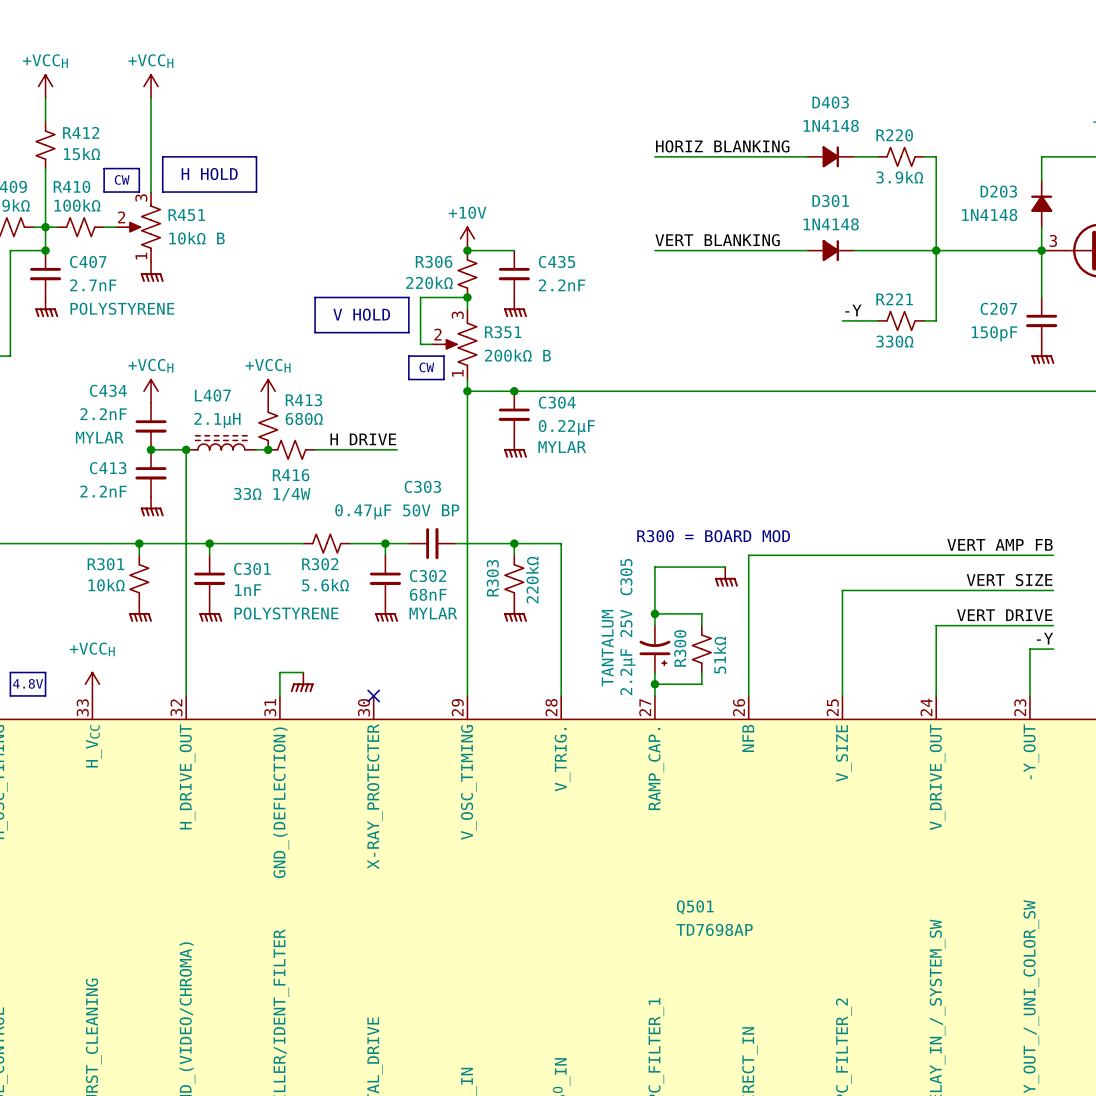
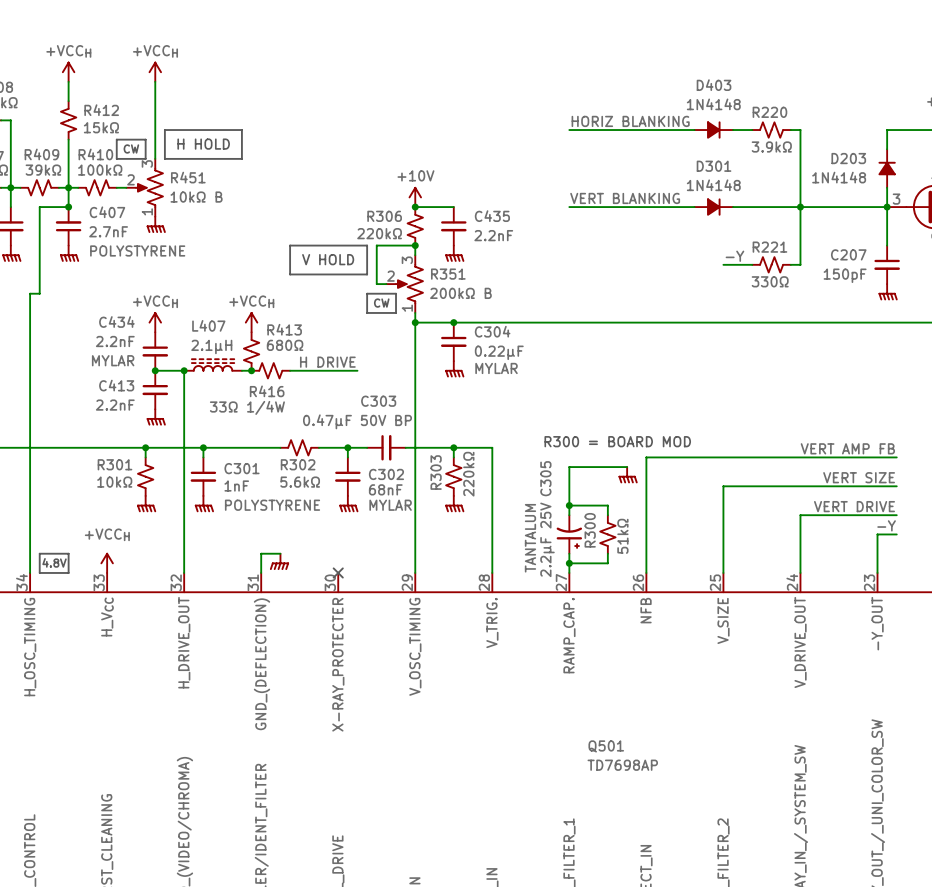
R412 flip: as is (45, 145) -> left-right (68, 120)
R410 flip: as is (80, 227) -> left-right (97, 187)
C407 rotation: 0° (45, 274) -> 180° (68, 226)

